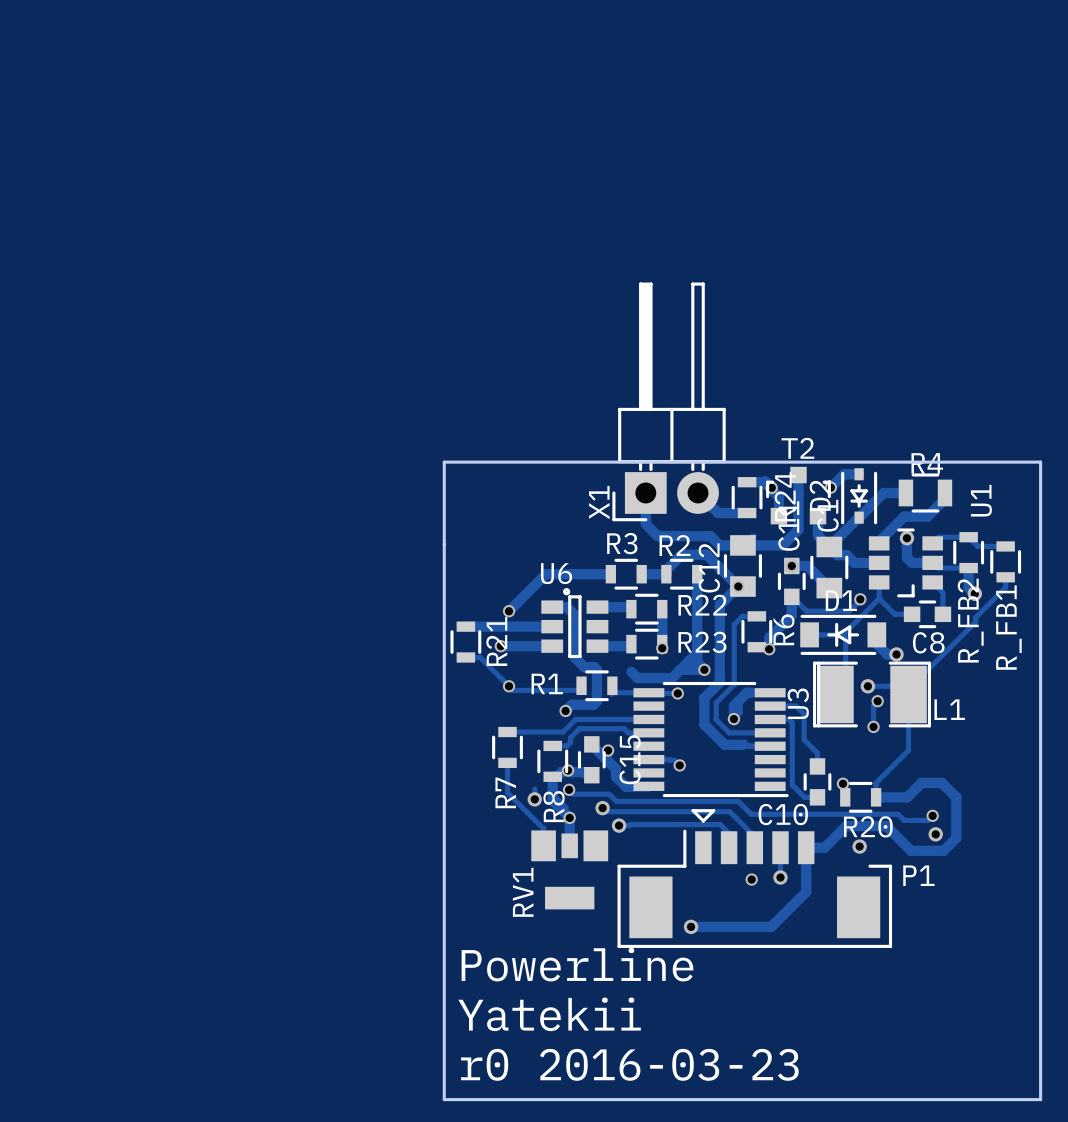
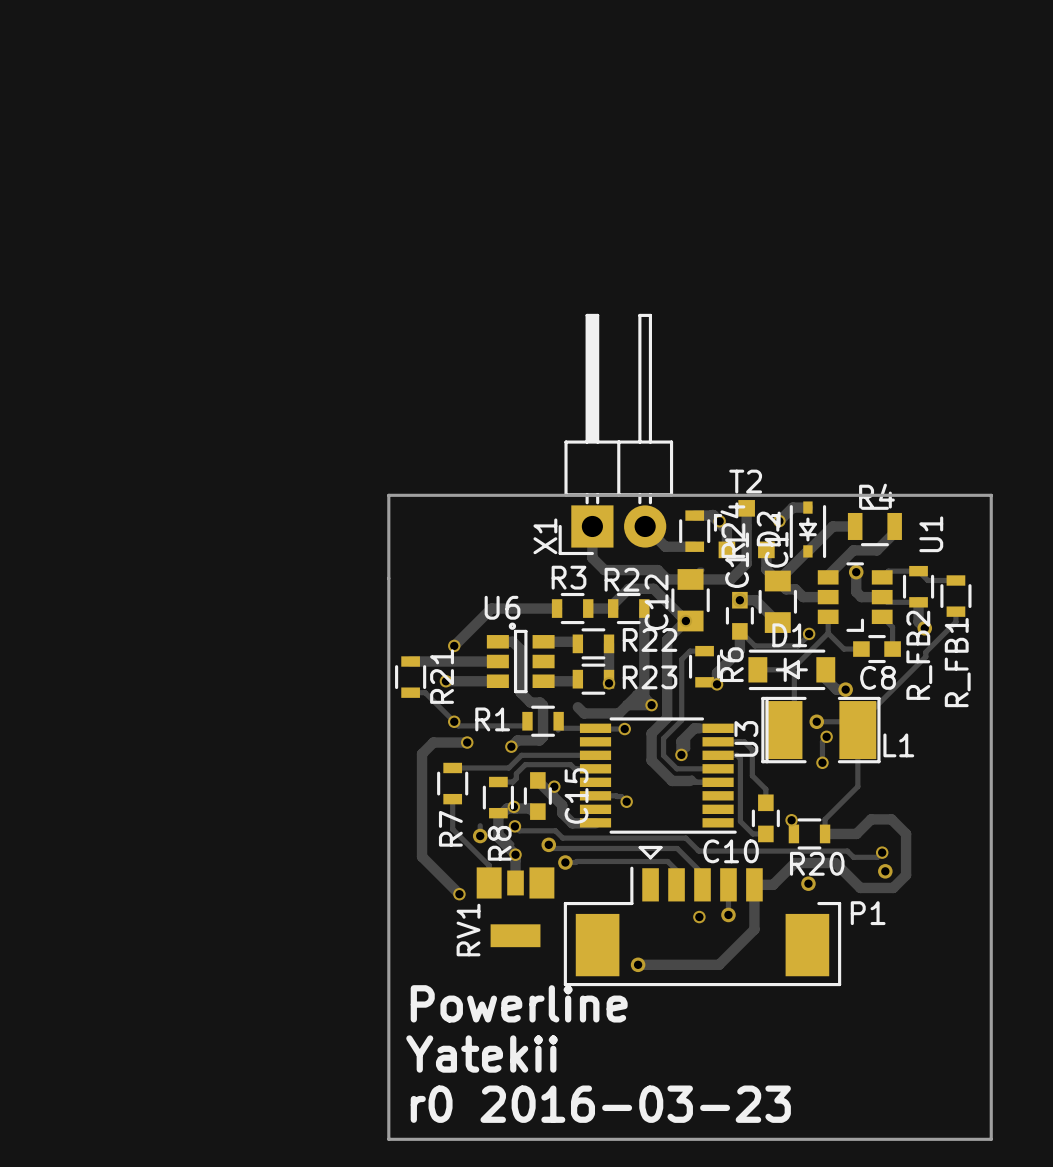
track: none -> (467, 742) (433, 742) (422, 753) (422, 856) (459, 894)
via: none -> (467, 742)
via: none -> (459, 894)

